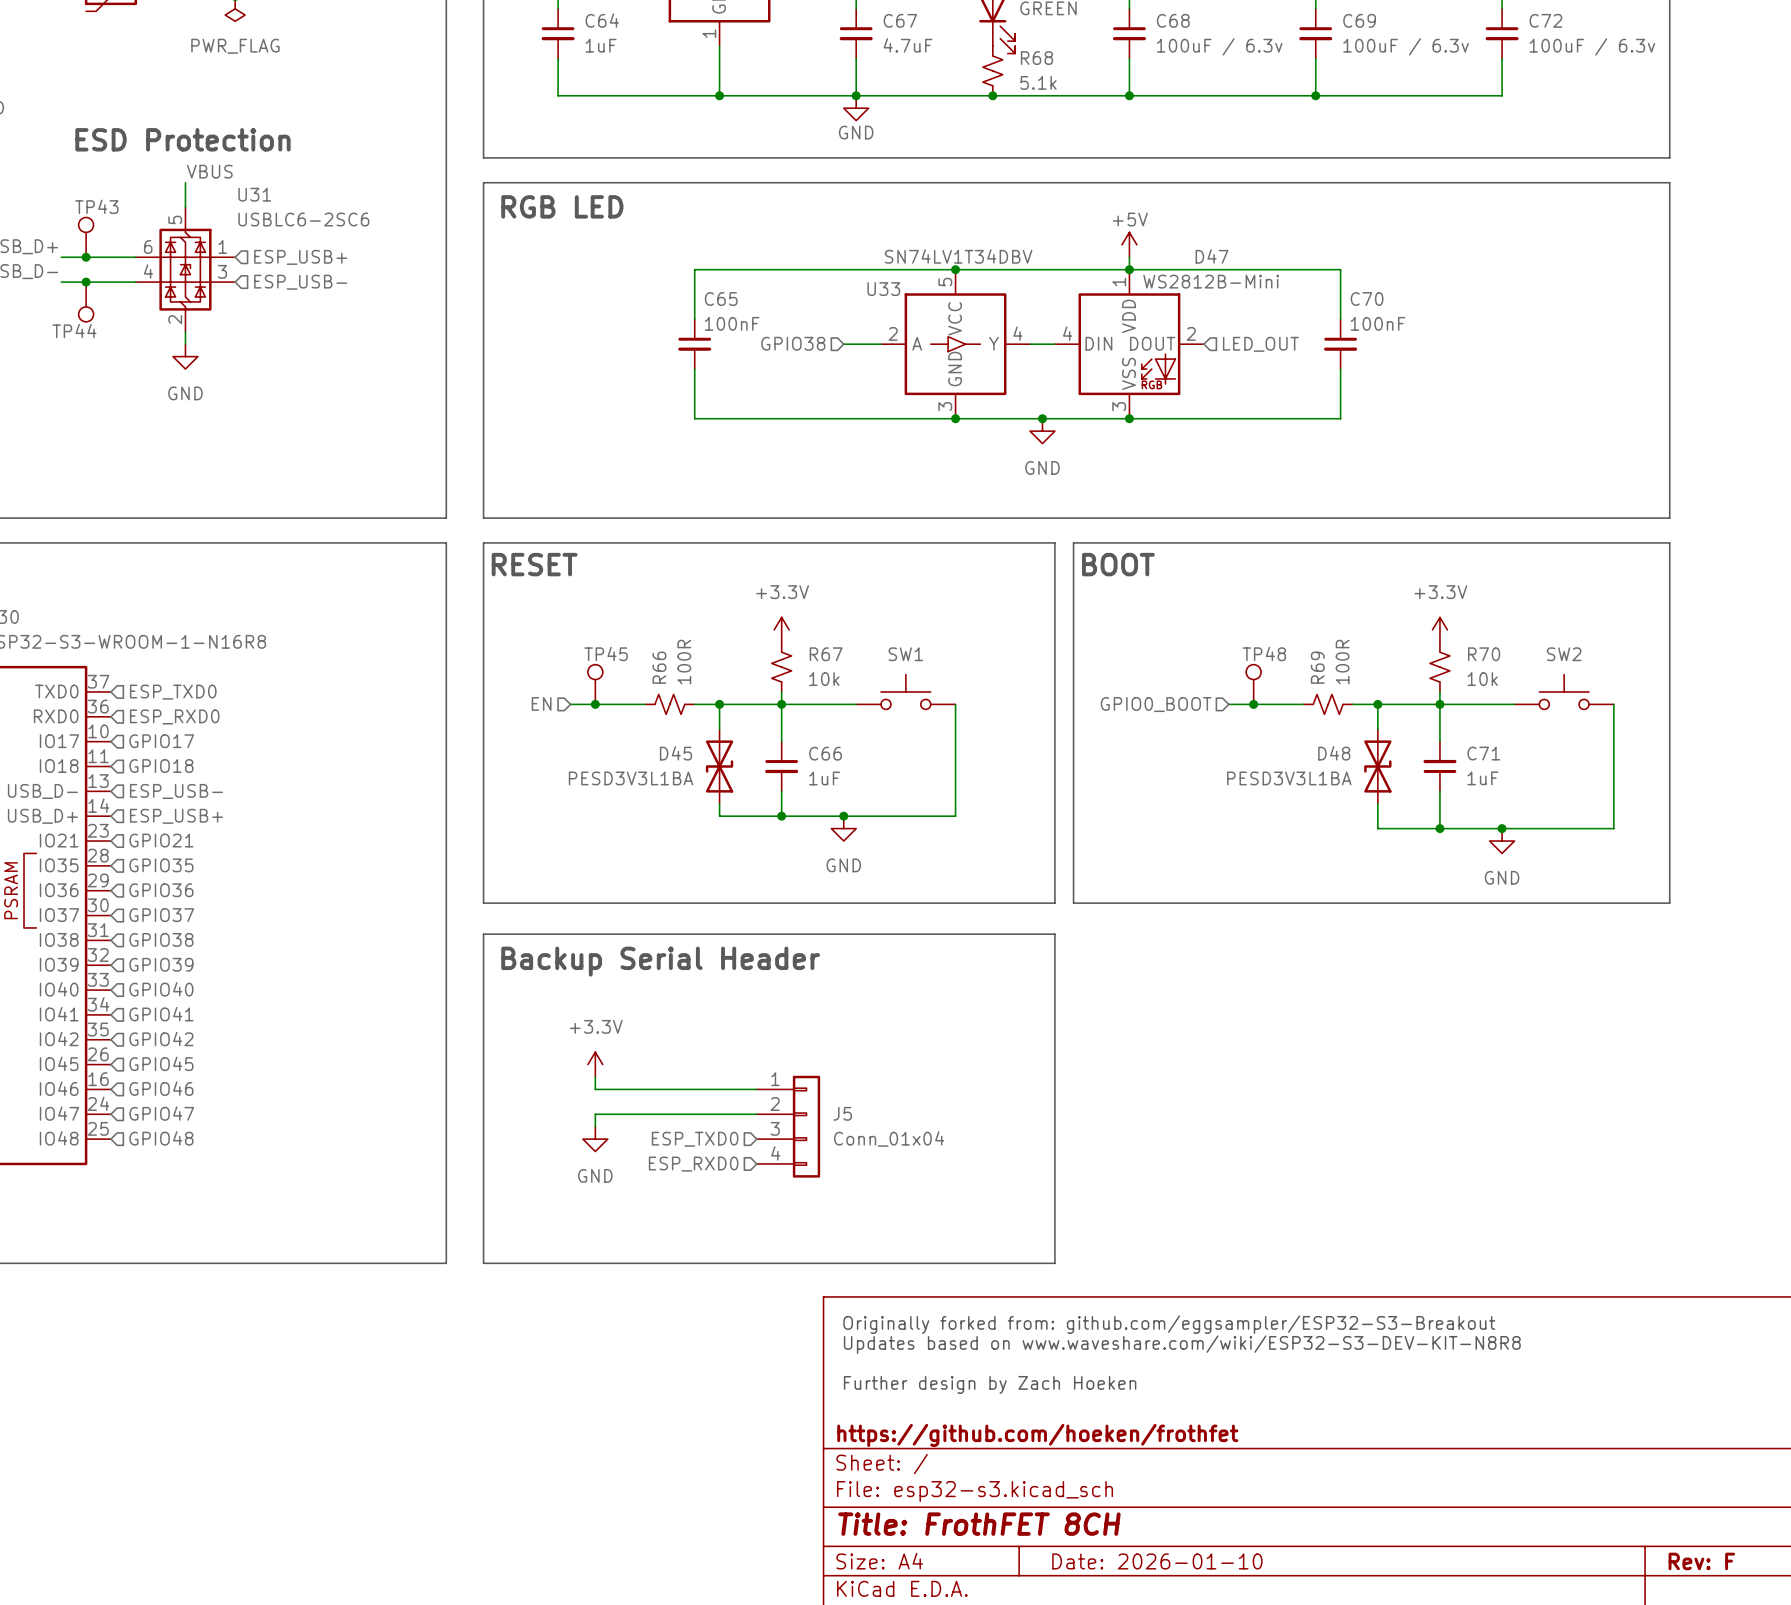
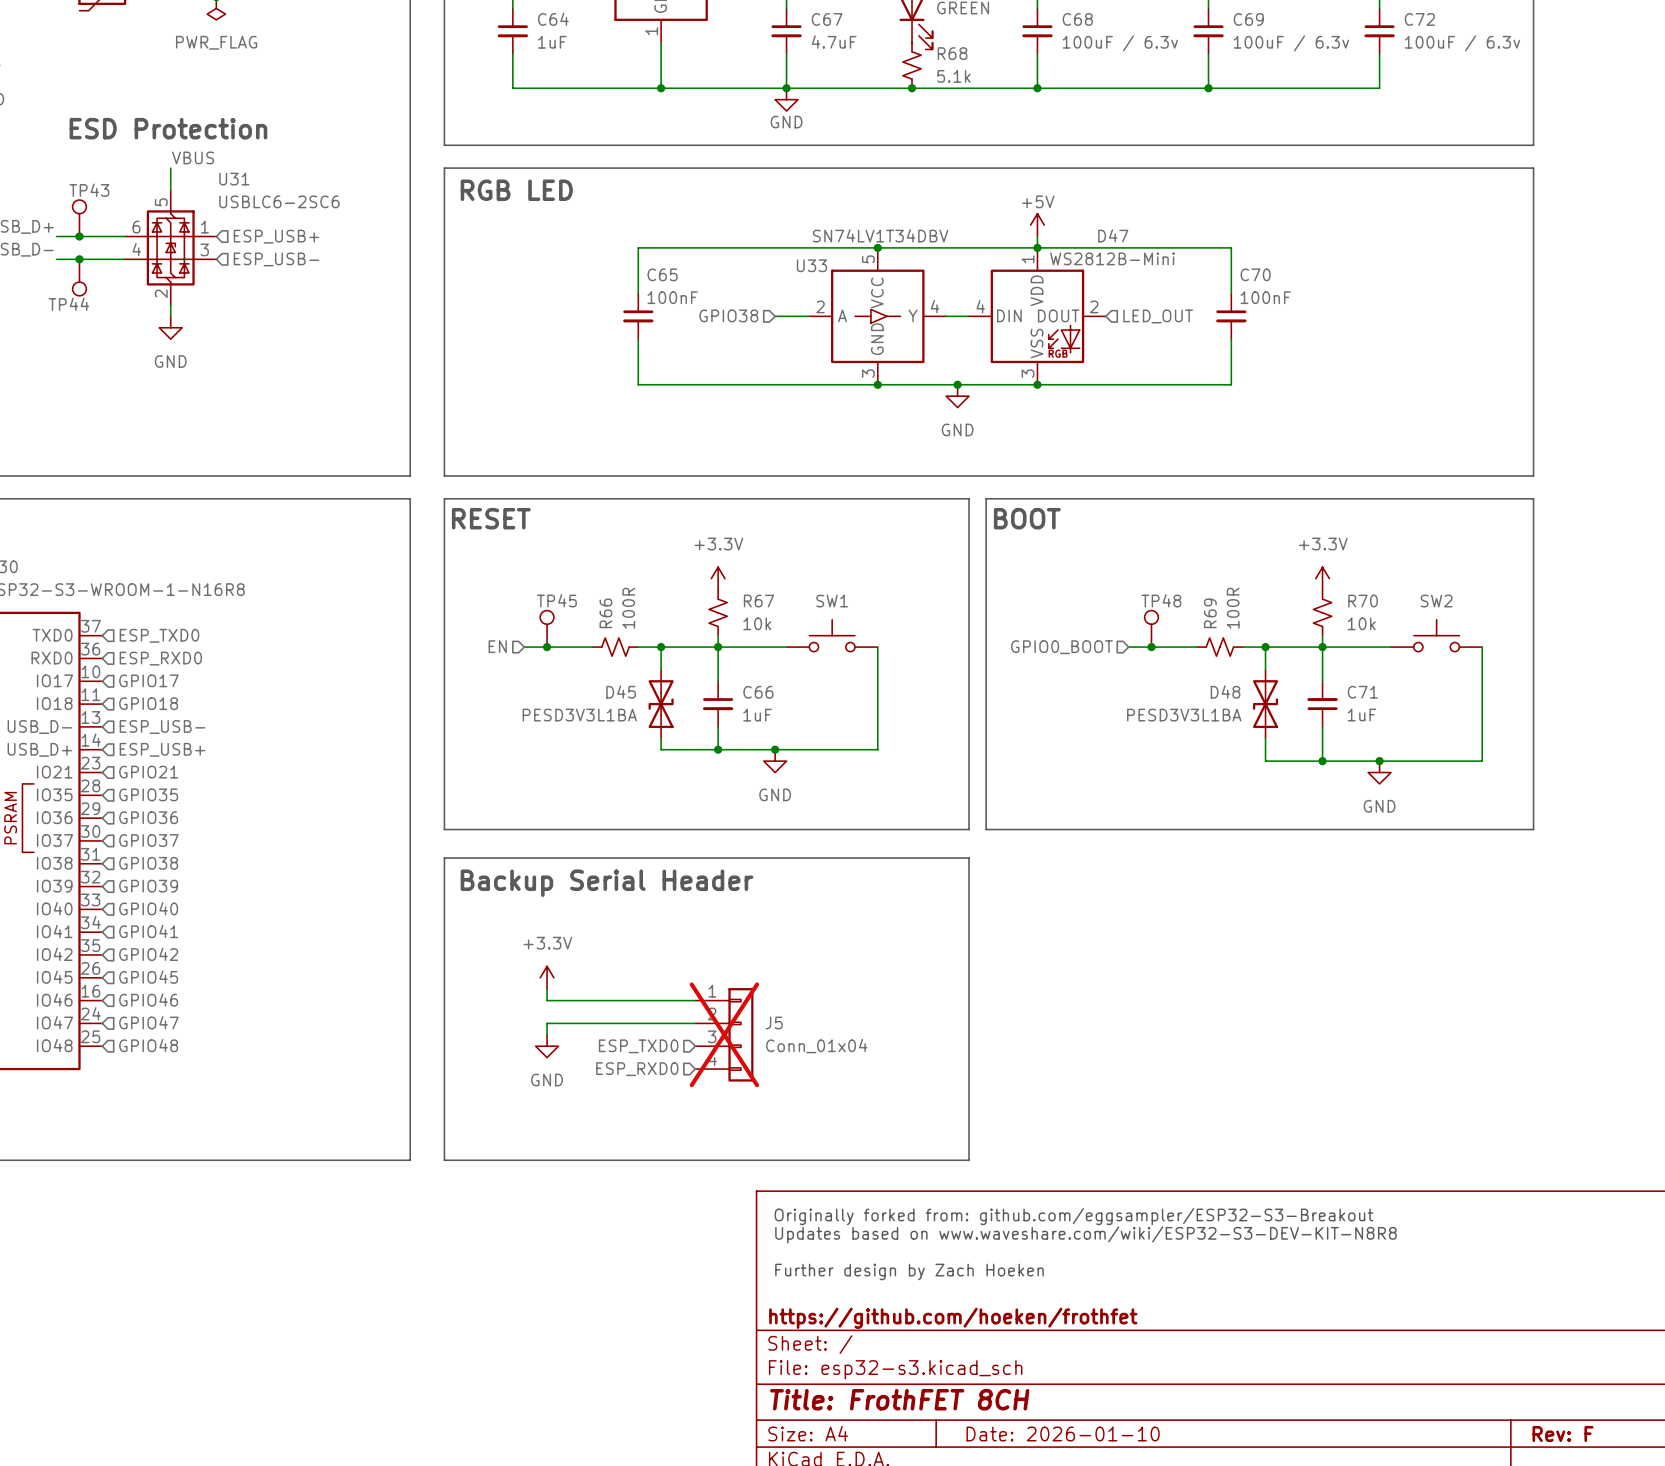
J5 do-not-place cross: none -> (724, 1034)

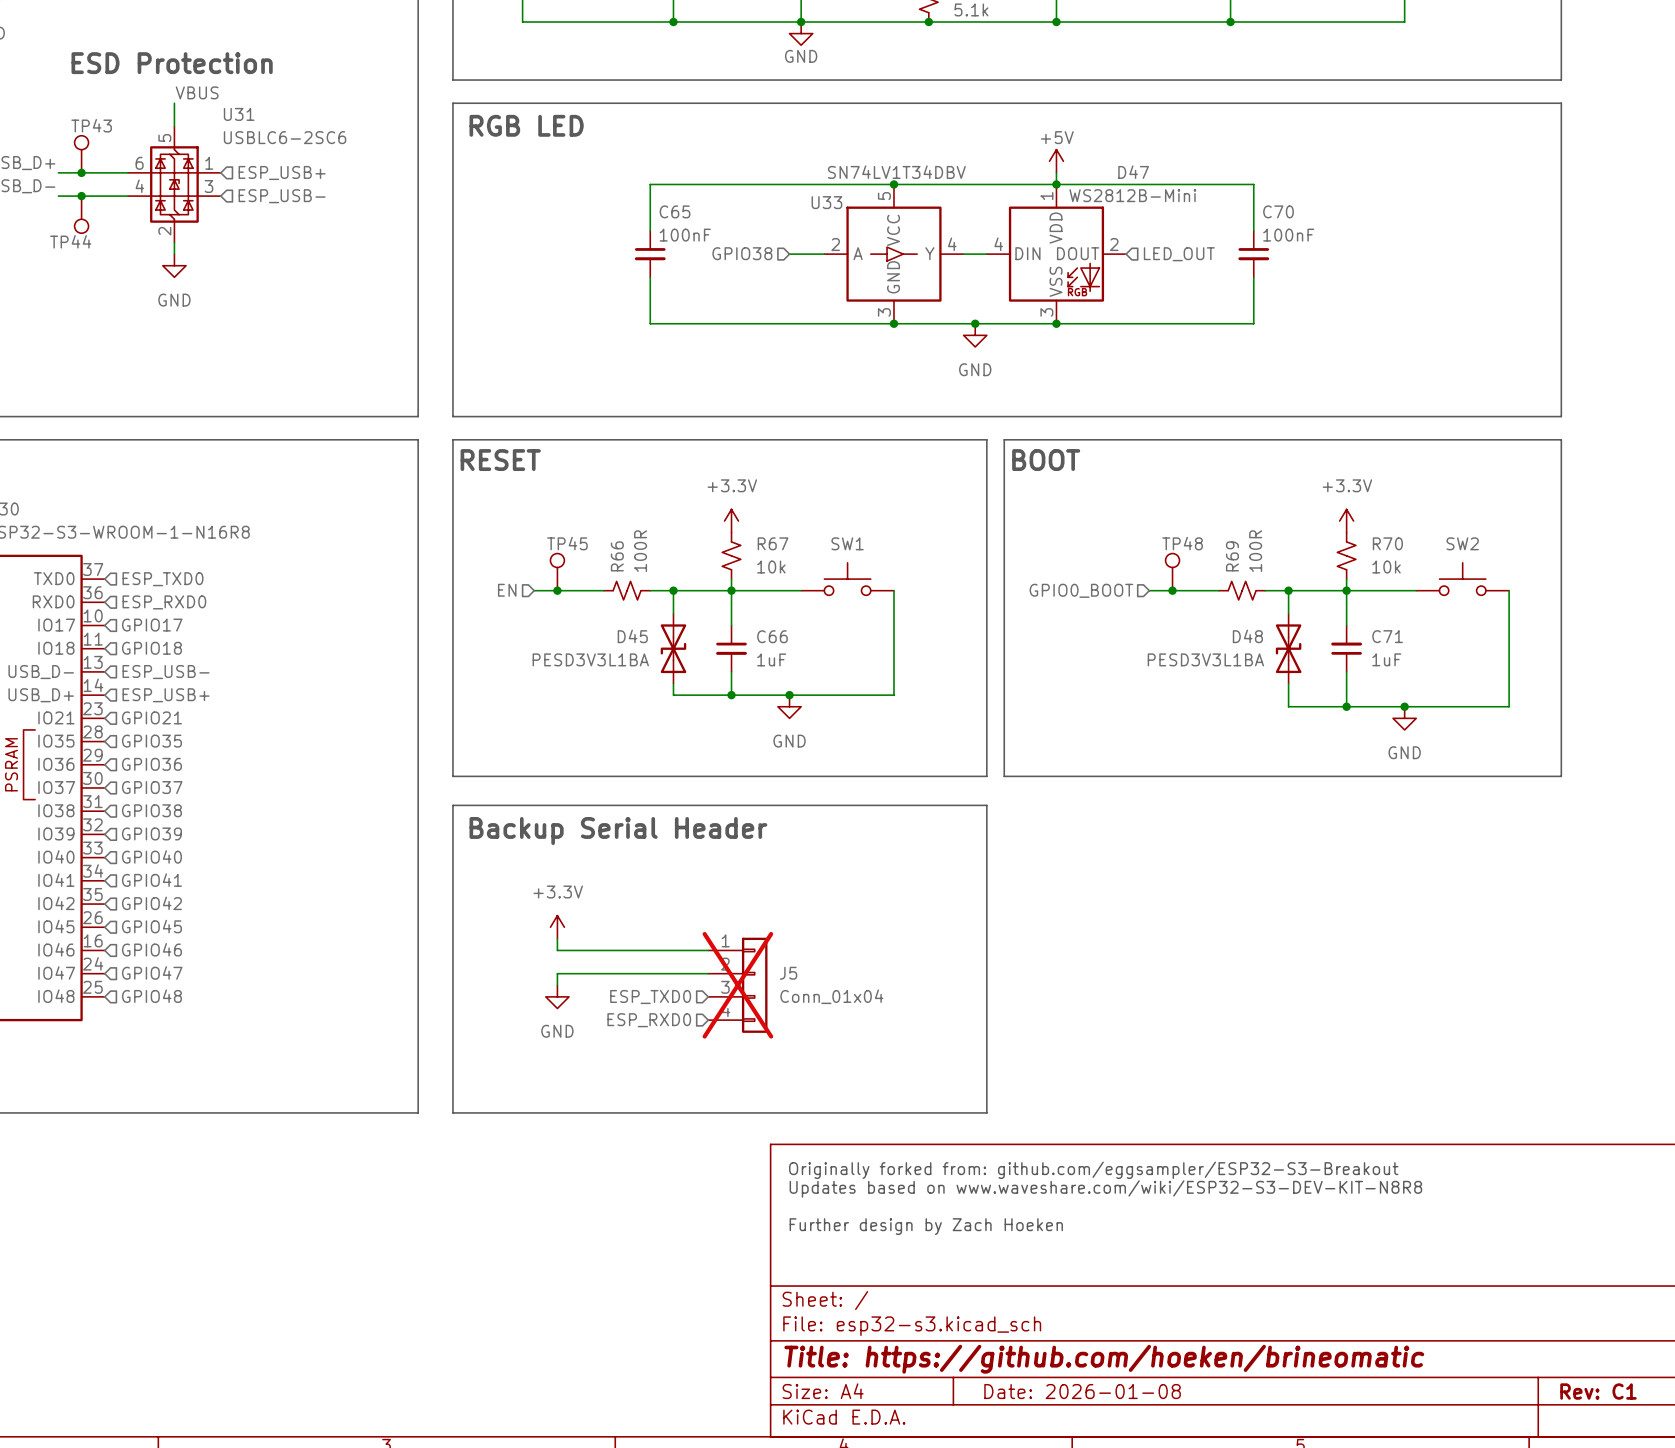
title block: https://github.com/hoeken/frothfet (953, 1318) -> none
title block: Title: FrothFET 8CH (899, 1399) -> Title: https://github.com/hoeken/brineomatic (1104, 1359)
title block: Date: 2026-01-10 (1063, 1434) -> Date: 2026-01-08 (1082, 1391)
title block: Rev: F (1562, 1434) -> Rev: C1 (1598, 1391)

